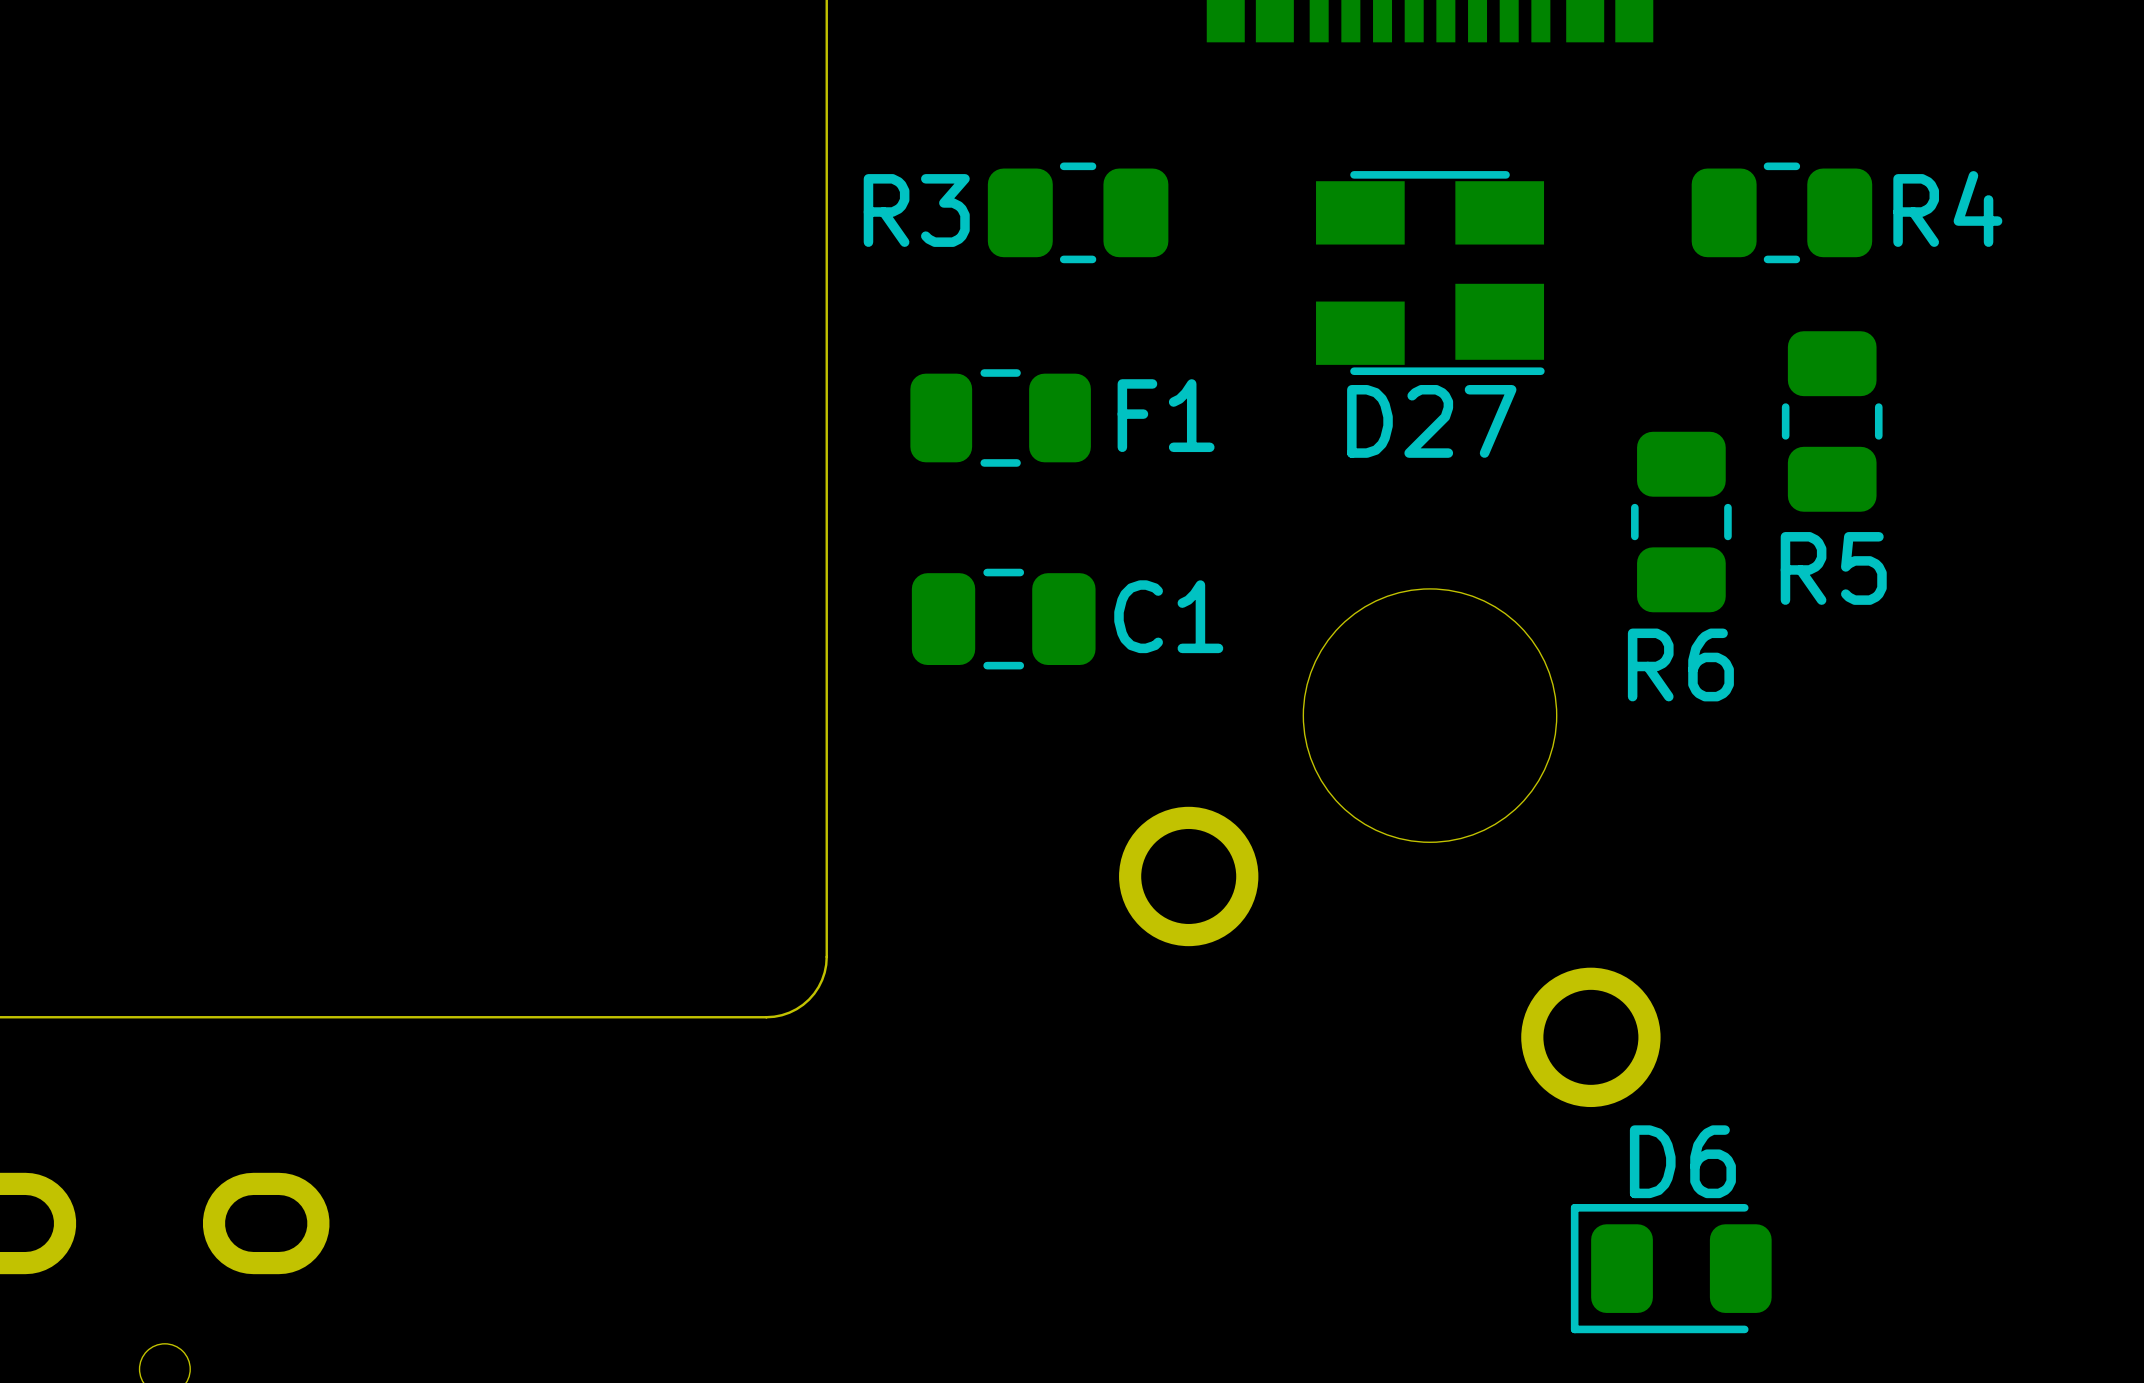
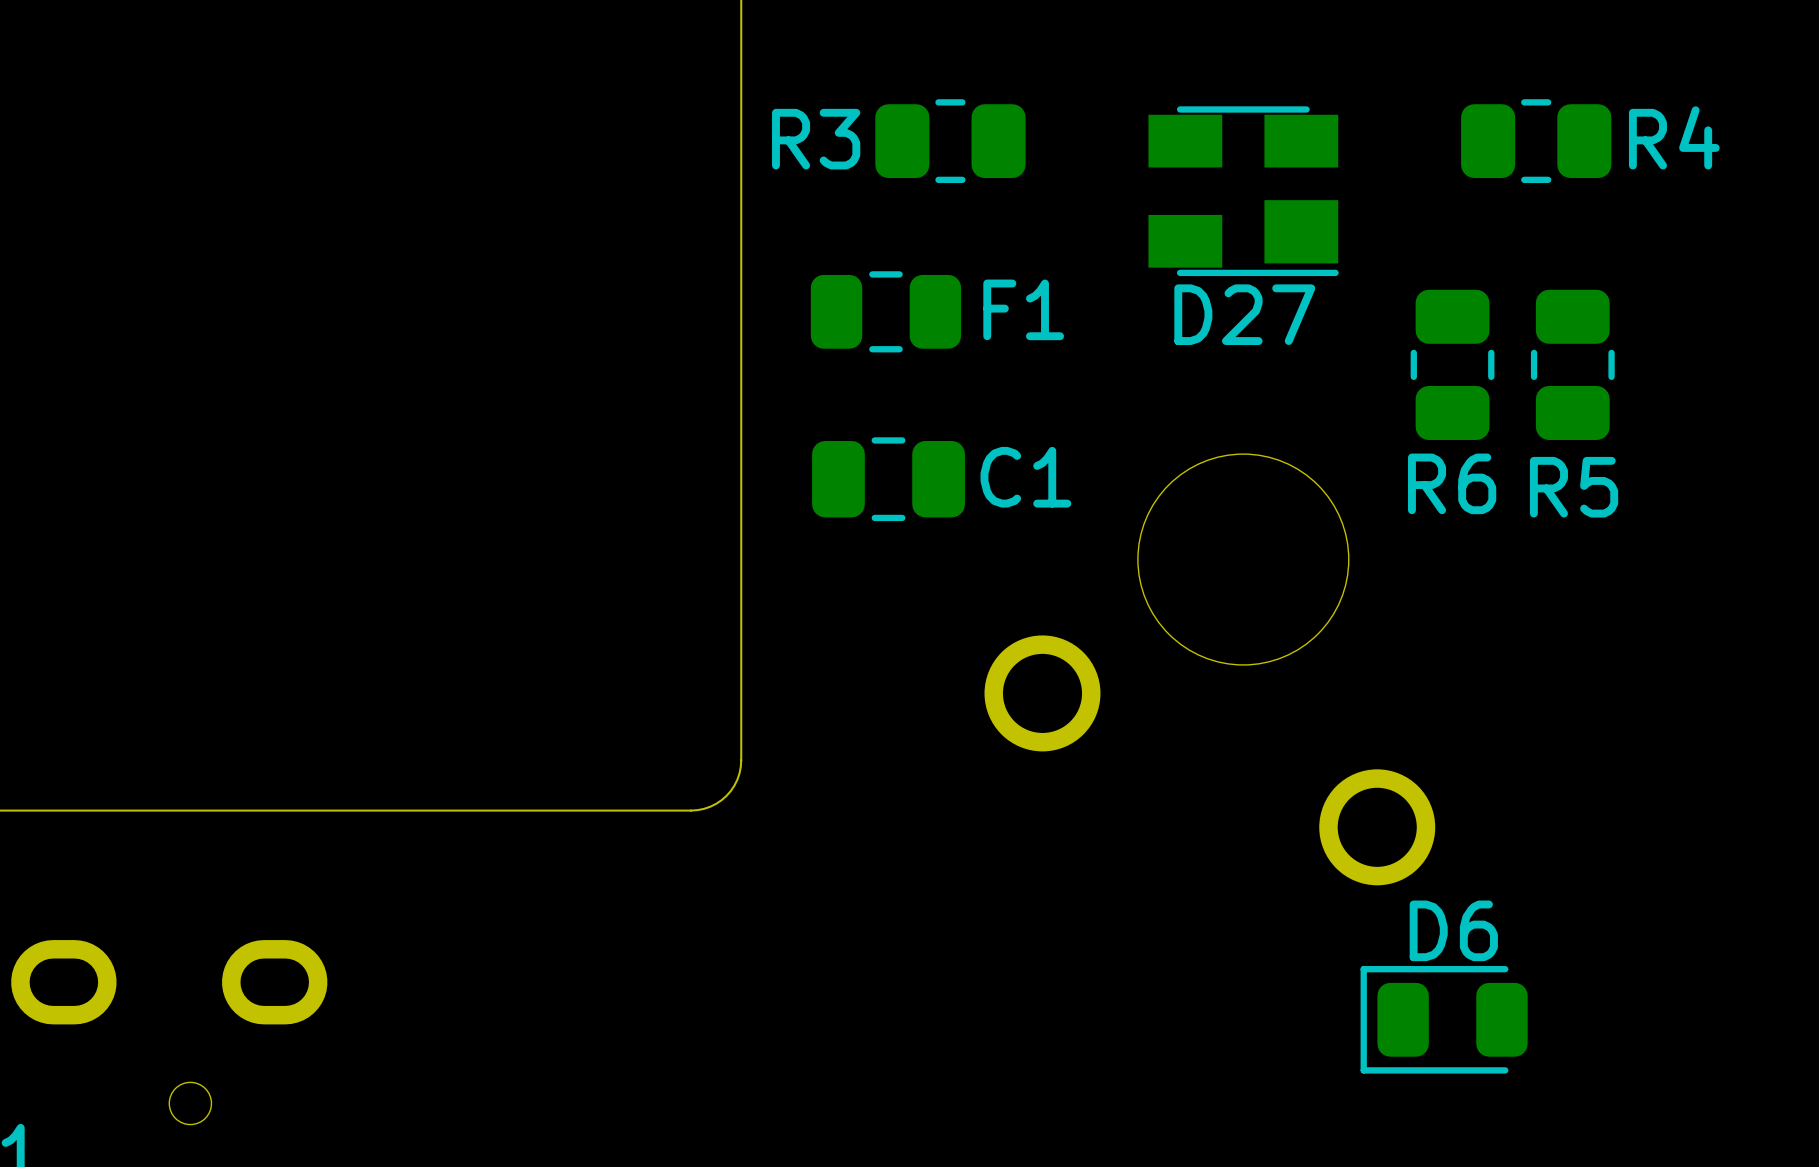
R5 position: (1832, 421) -> (1572, 364)
R6 position: (1681, 522) -> (1452, 364)

